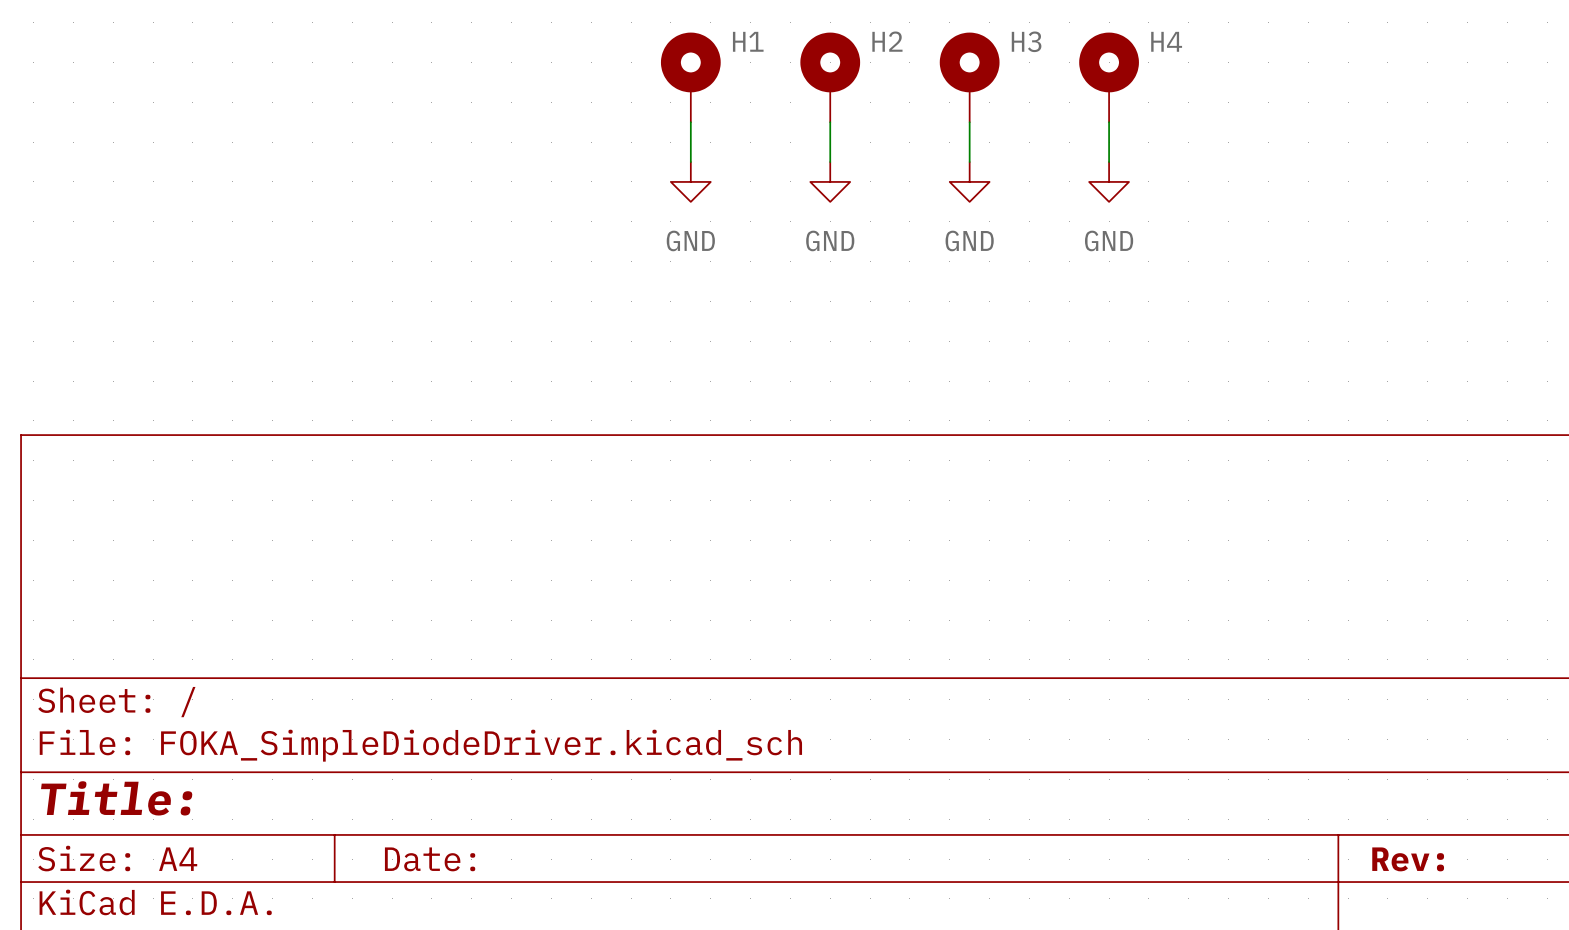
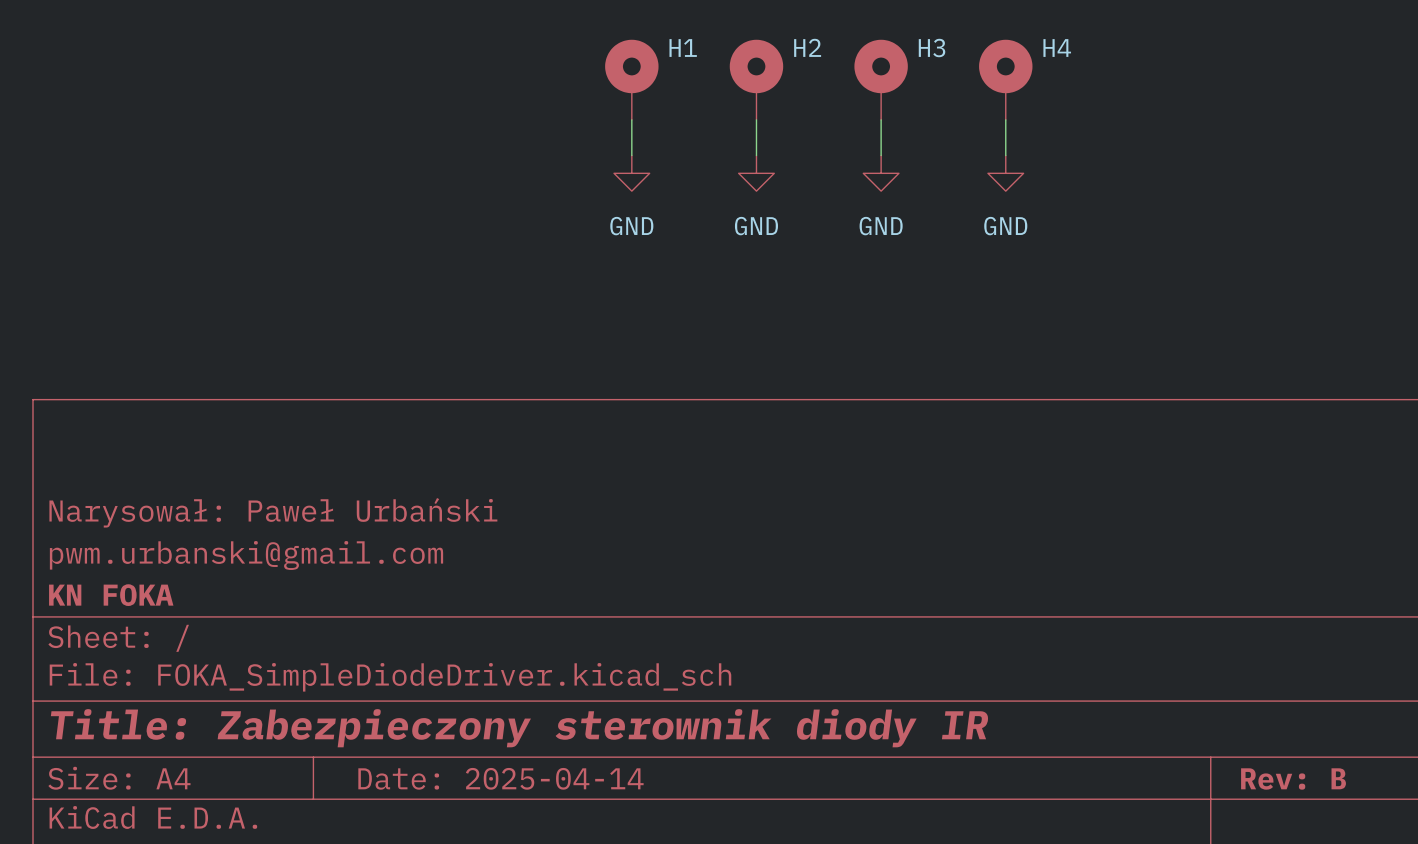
title block: none -> Narysował: Paweł Urbański (273, 512)
title block: none -> pwm.urbanski@gmail.com (246, 555)
title block: none -> KN FOKA (111, 595)
title block: Title: (116, 798) -> Title: Zabezpieczony sterownik diody IR (519, 728)
title block: Date: (430, 859) -> Date: 2025-04-14 (500, 778)
title block: Rev: (1408, 859) -> Rev: B (1293, 778)

